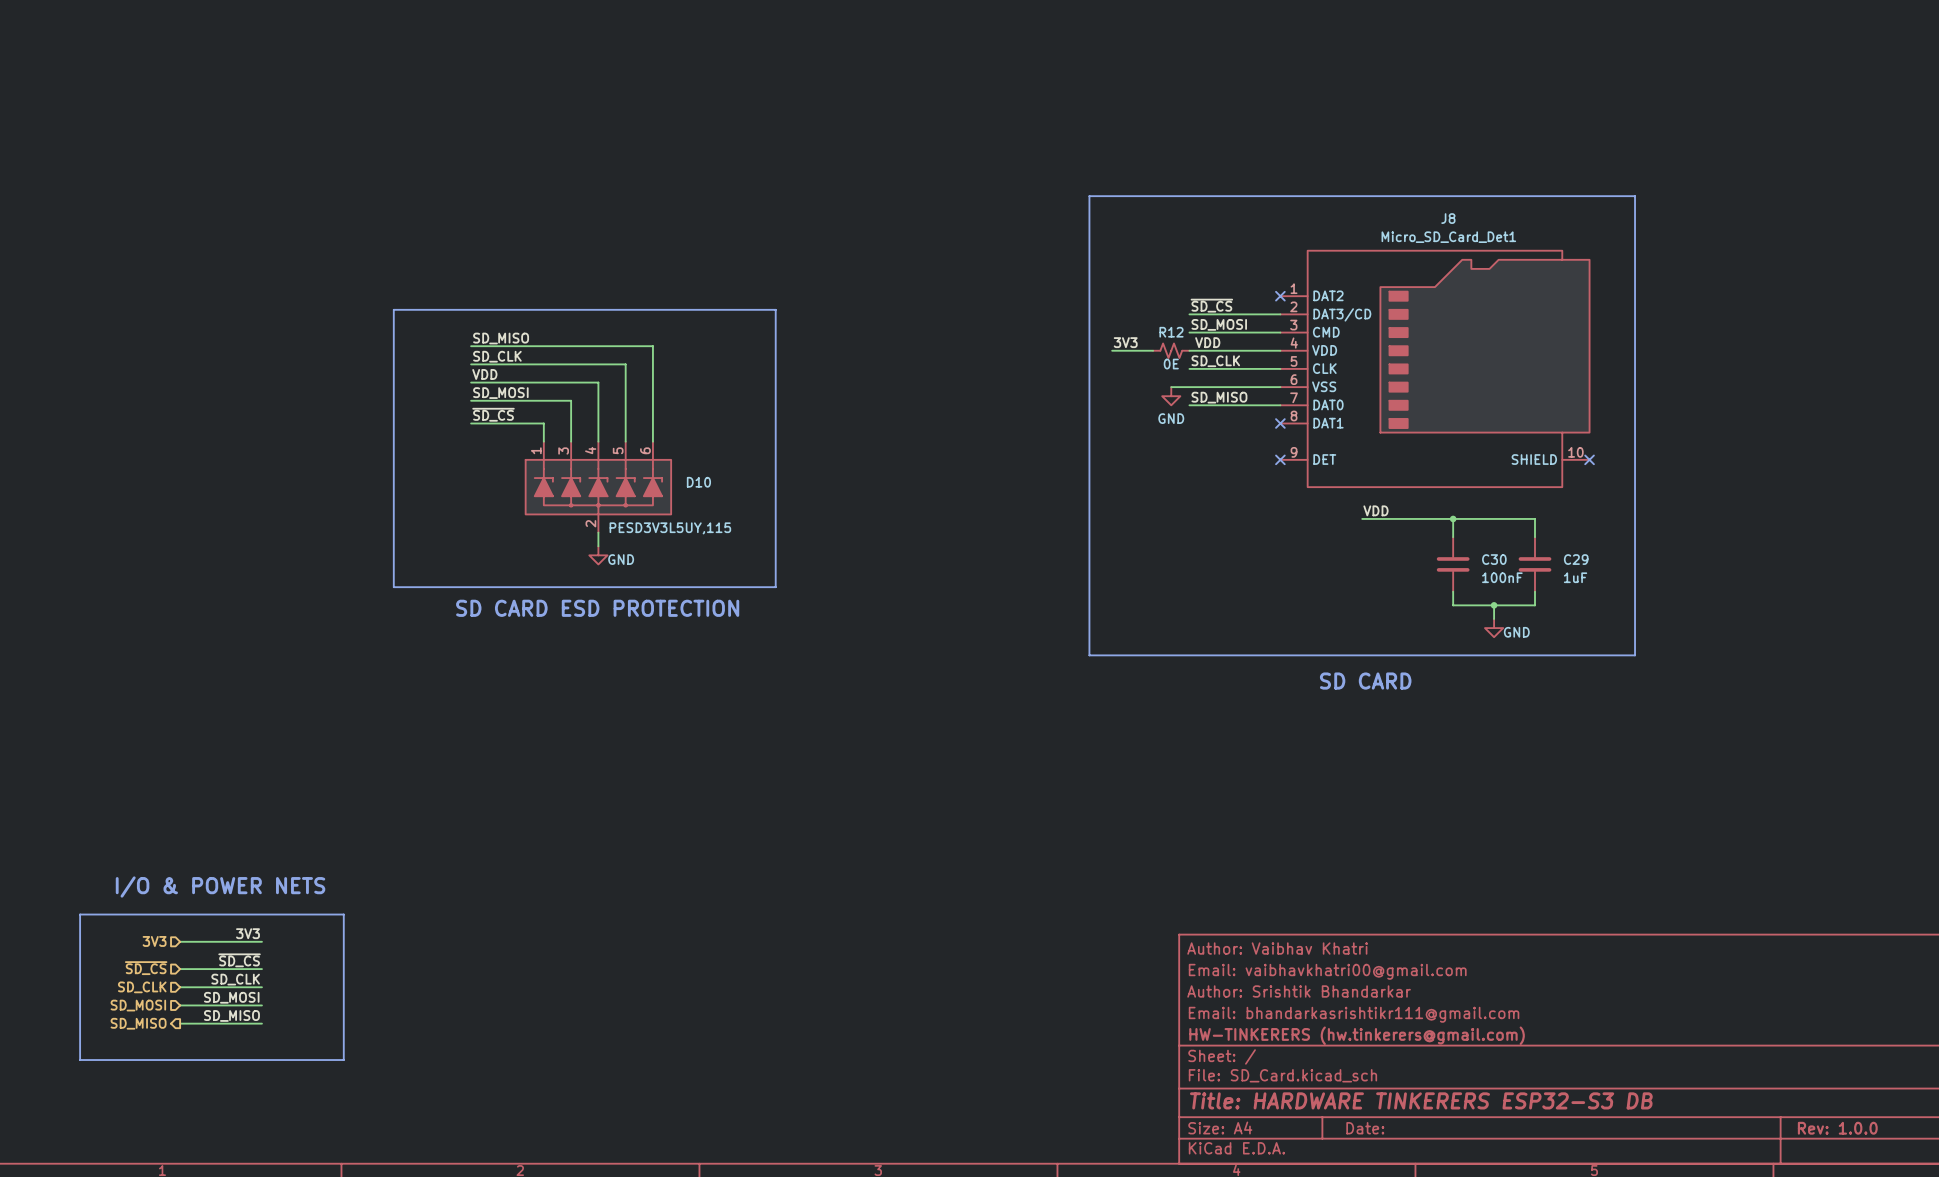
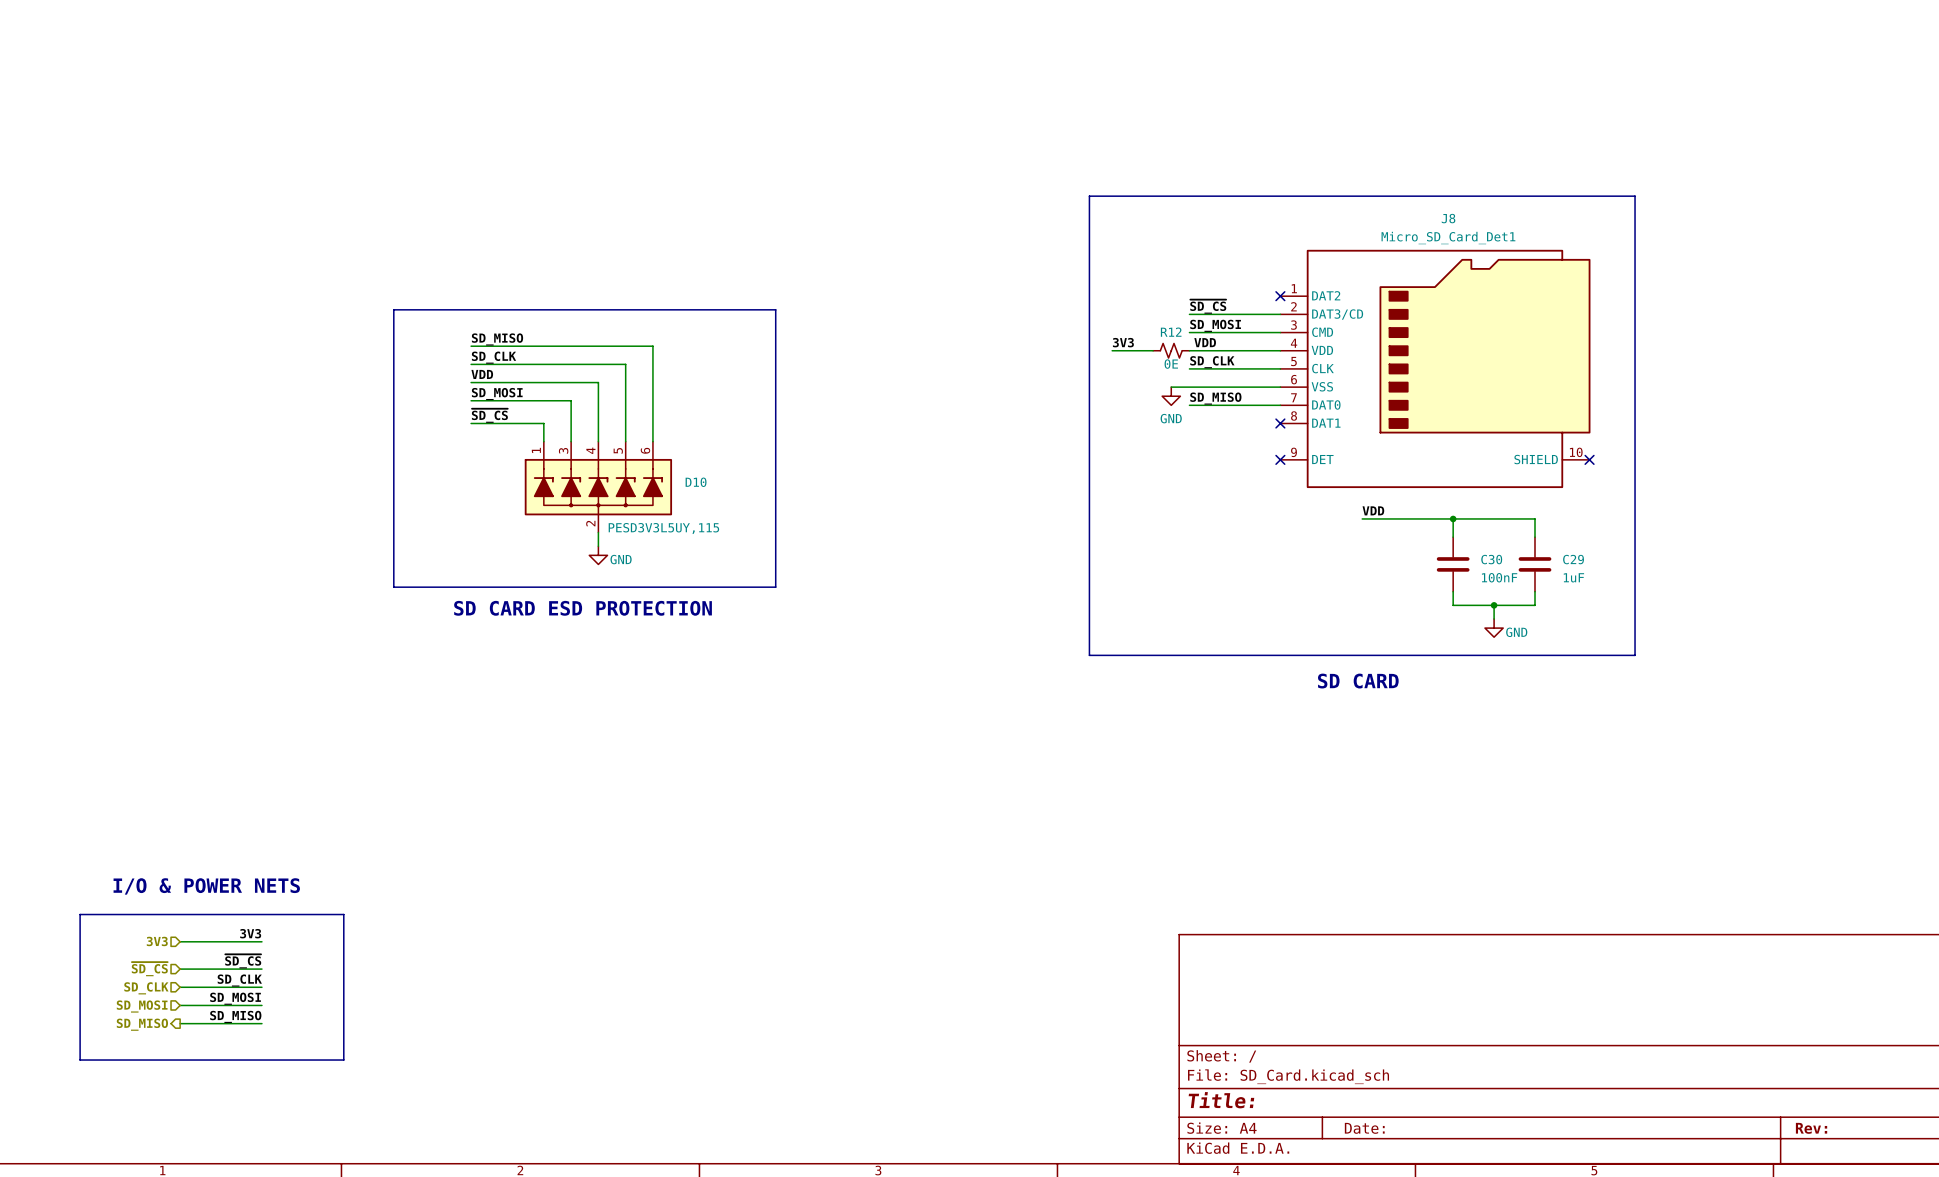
title block: Author: Vaibhav Khatri (1277, 948) -> none
title block: Email: vaibhavkhatri00@gmail.com (1327, 971) -> none
title block: Author: Srishtik Bhandarkar (1299, 991) -> none
title block: Email: bhandarkasrishtikr111@gmail.com (1354, 1014) -> none
title block: HW-TINKERERS (hw.tinkerers@gmail.com) (1357, 1035) -> none
title block: Title: HARDWARE TINKERERS ESP32-S3 DB (1421, 1100) -> Title: (1221, 1100)
title block: Rev: 1.0.0 (1837, 1128) -> Rev: (1811, 1128)

